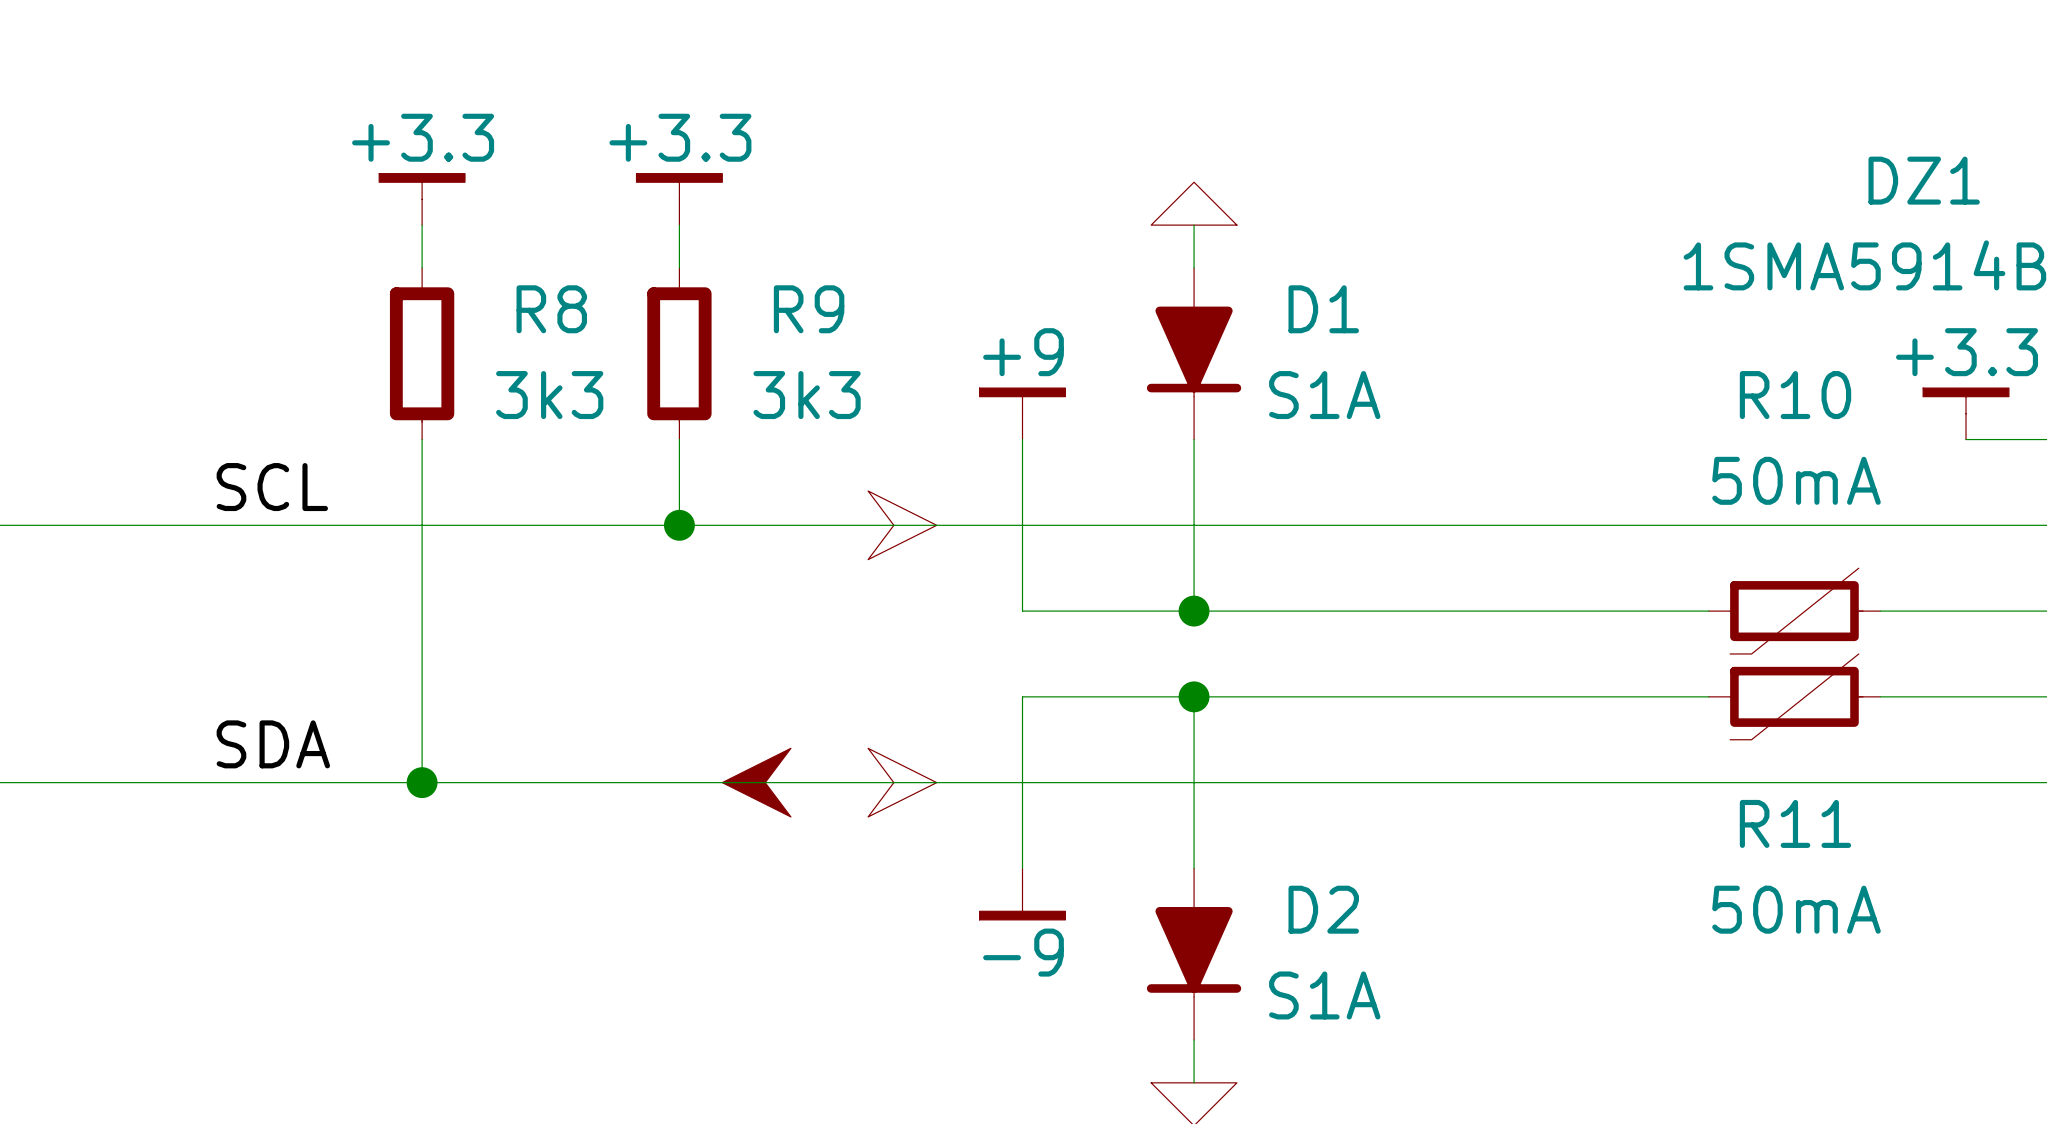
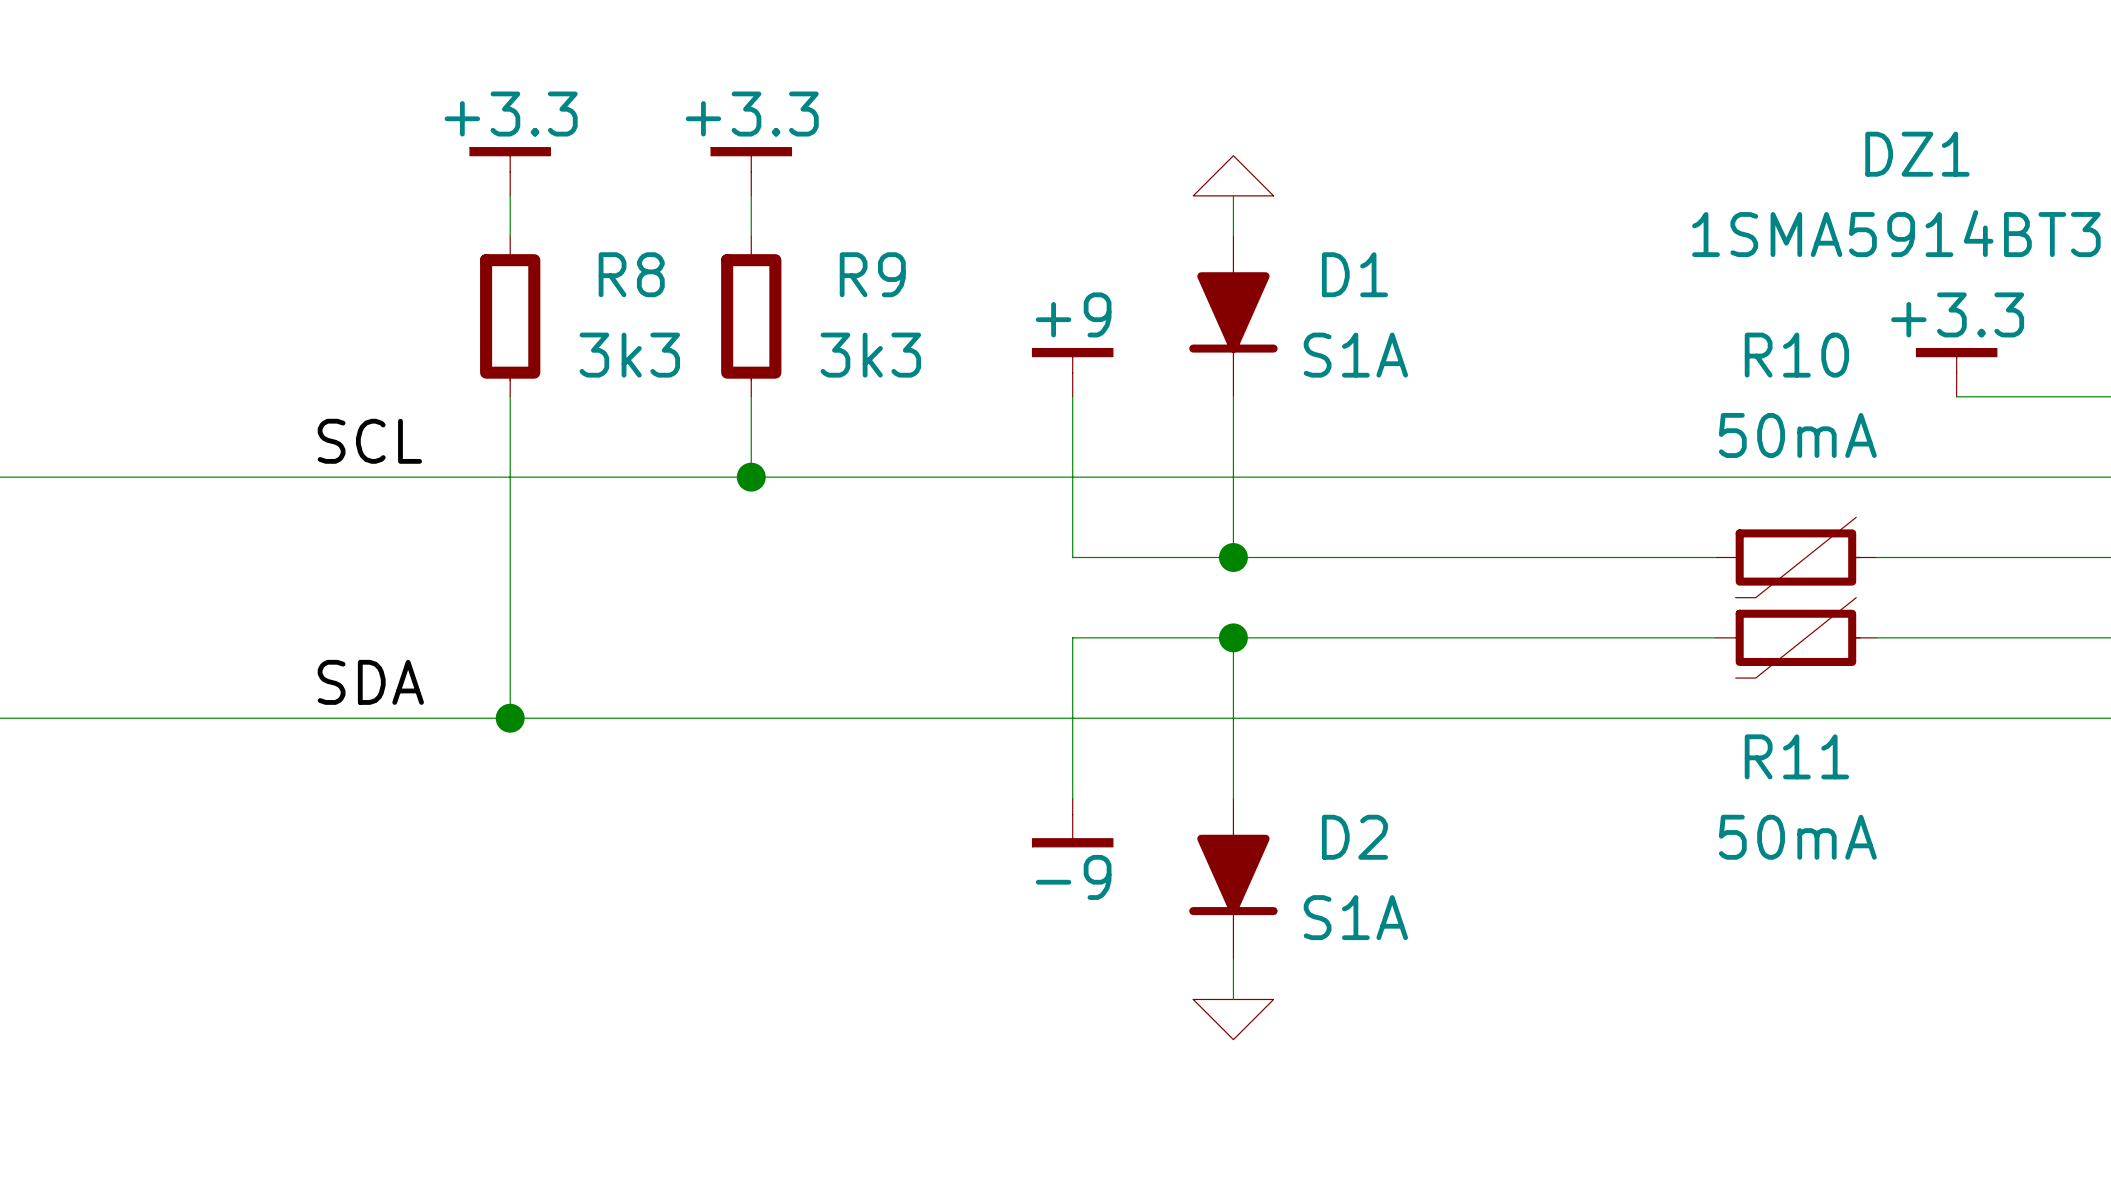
power symbol: (902, 525) -> none
power symbol: (756, 782) -> none
power symbol: (902, 782) -> none

